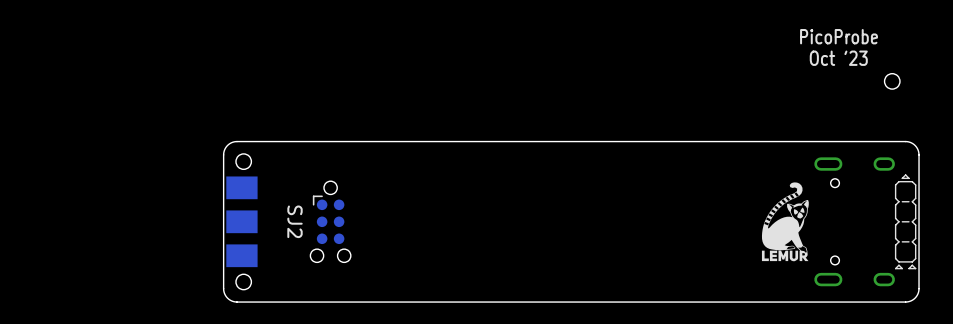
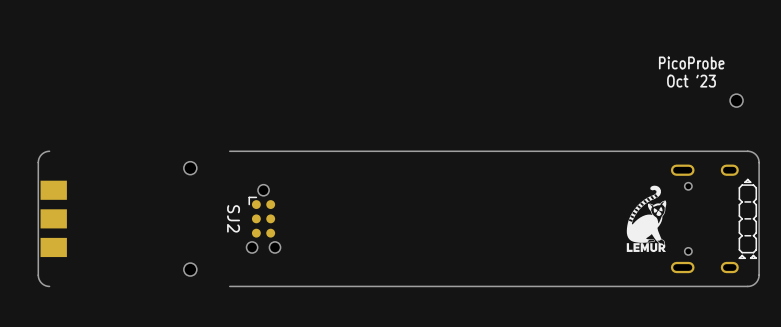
board edge: none -> (49, 151) (41, 154) (38, 162) (38, 276) (41, 283) (49, 286)
board edge: (290, 141) (234, 141) (226, 146) (223, 154) (224, 294) (228, 299) (235, 301) (290, 302) -> none
part position: (241, 221) -> (53, 218)

